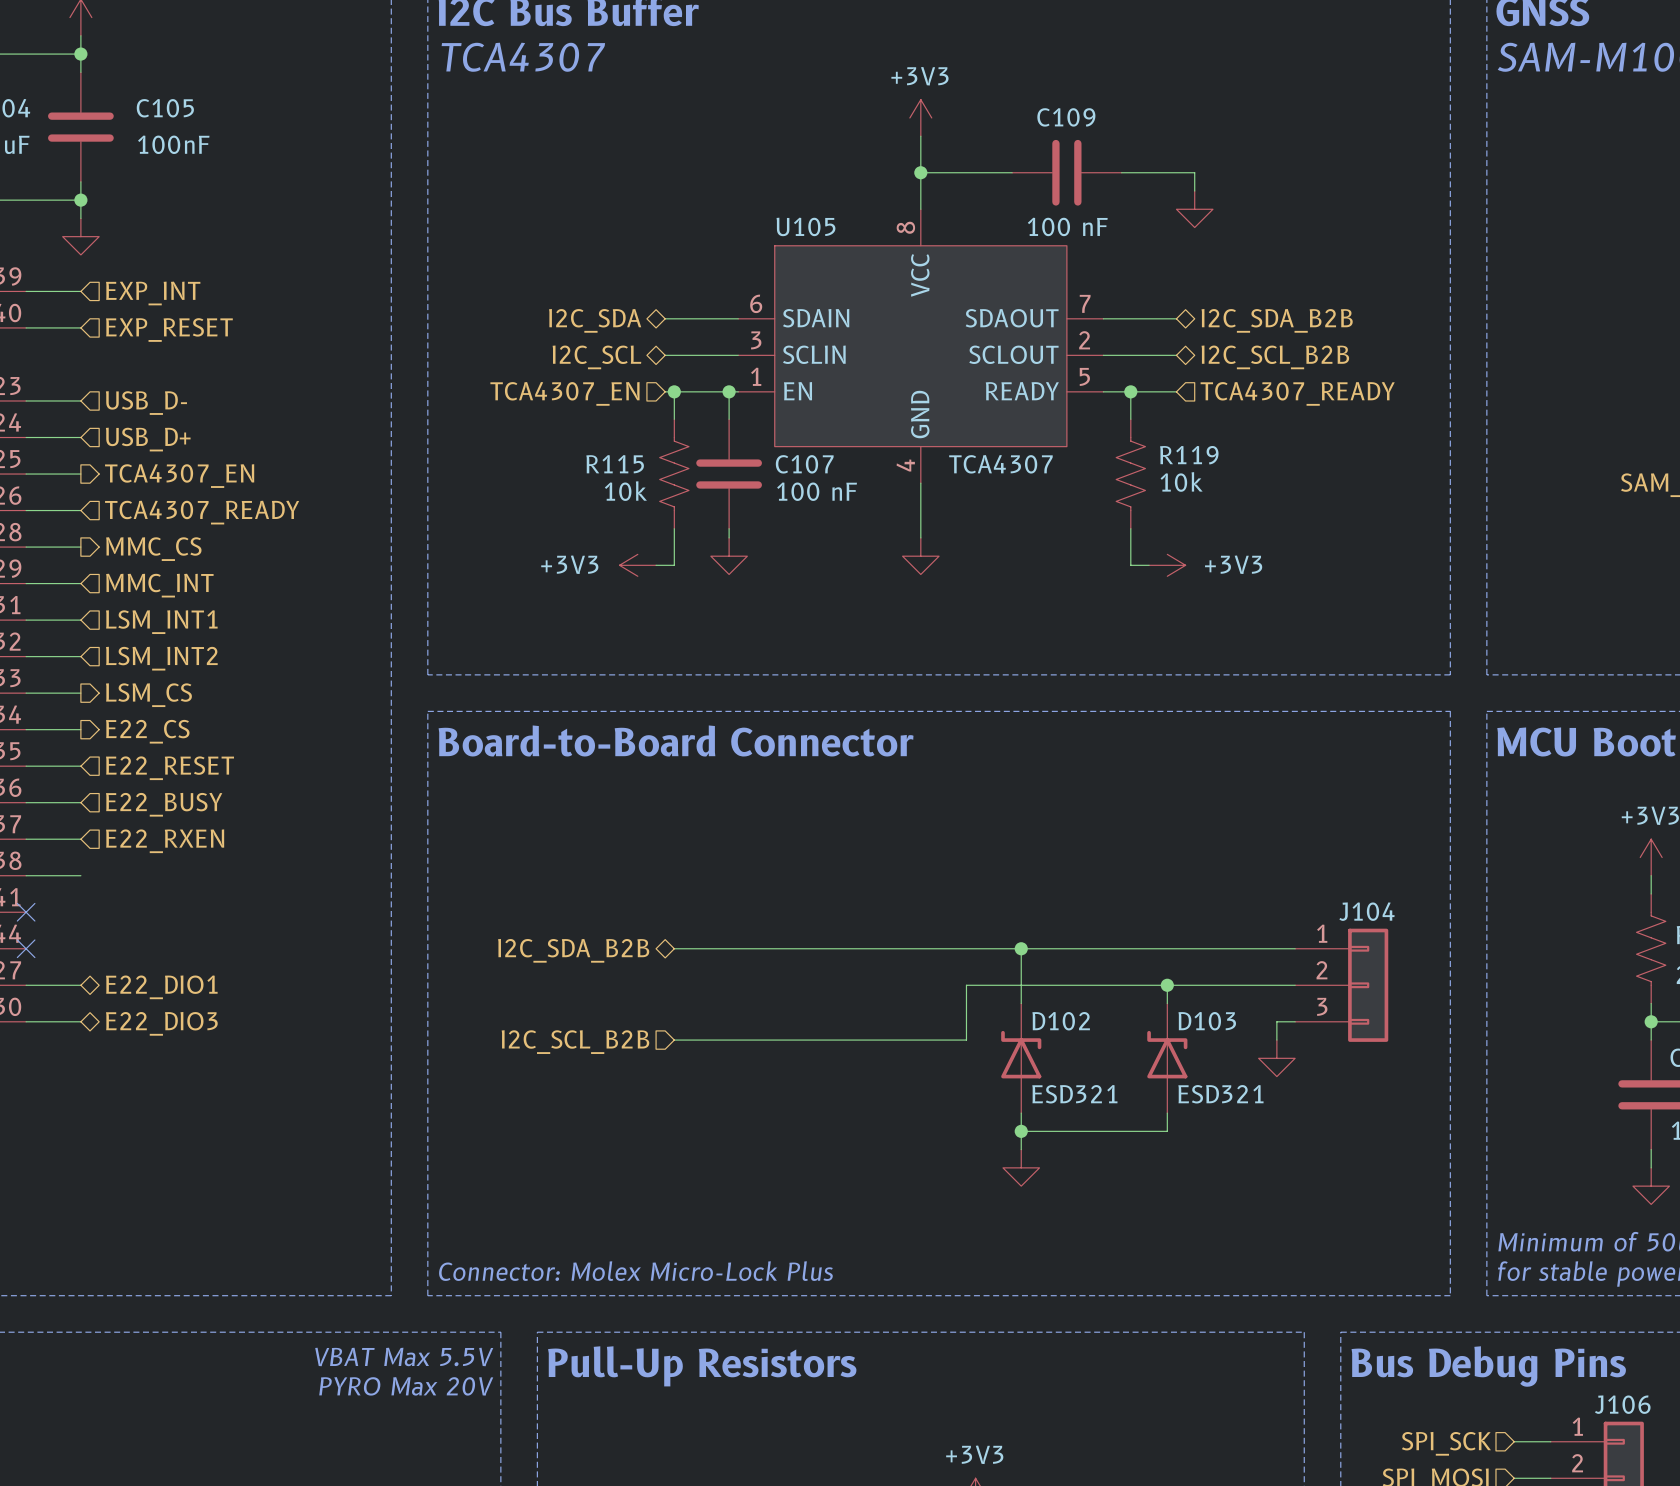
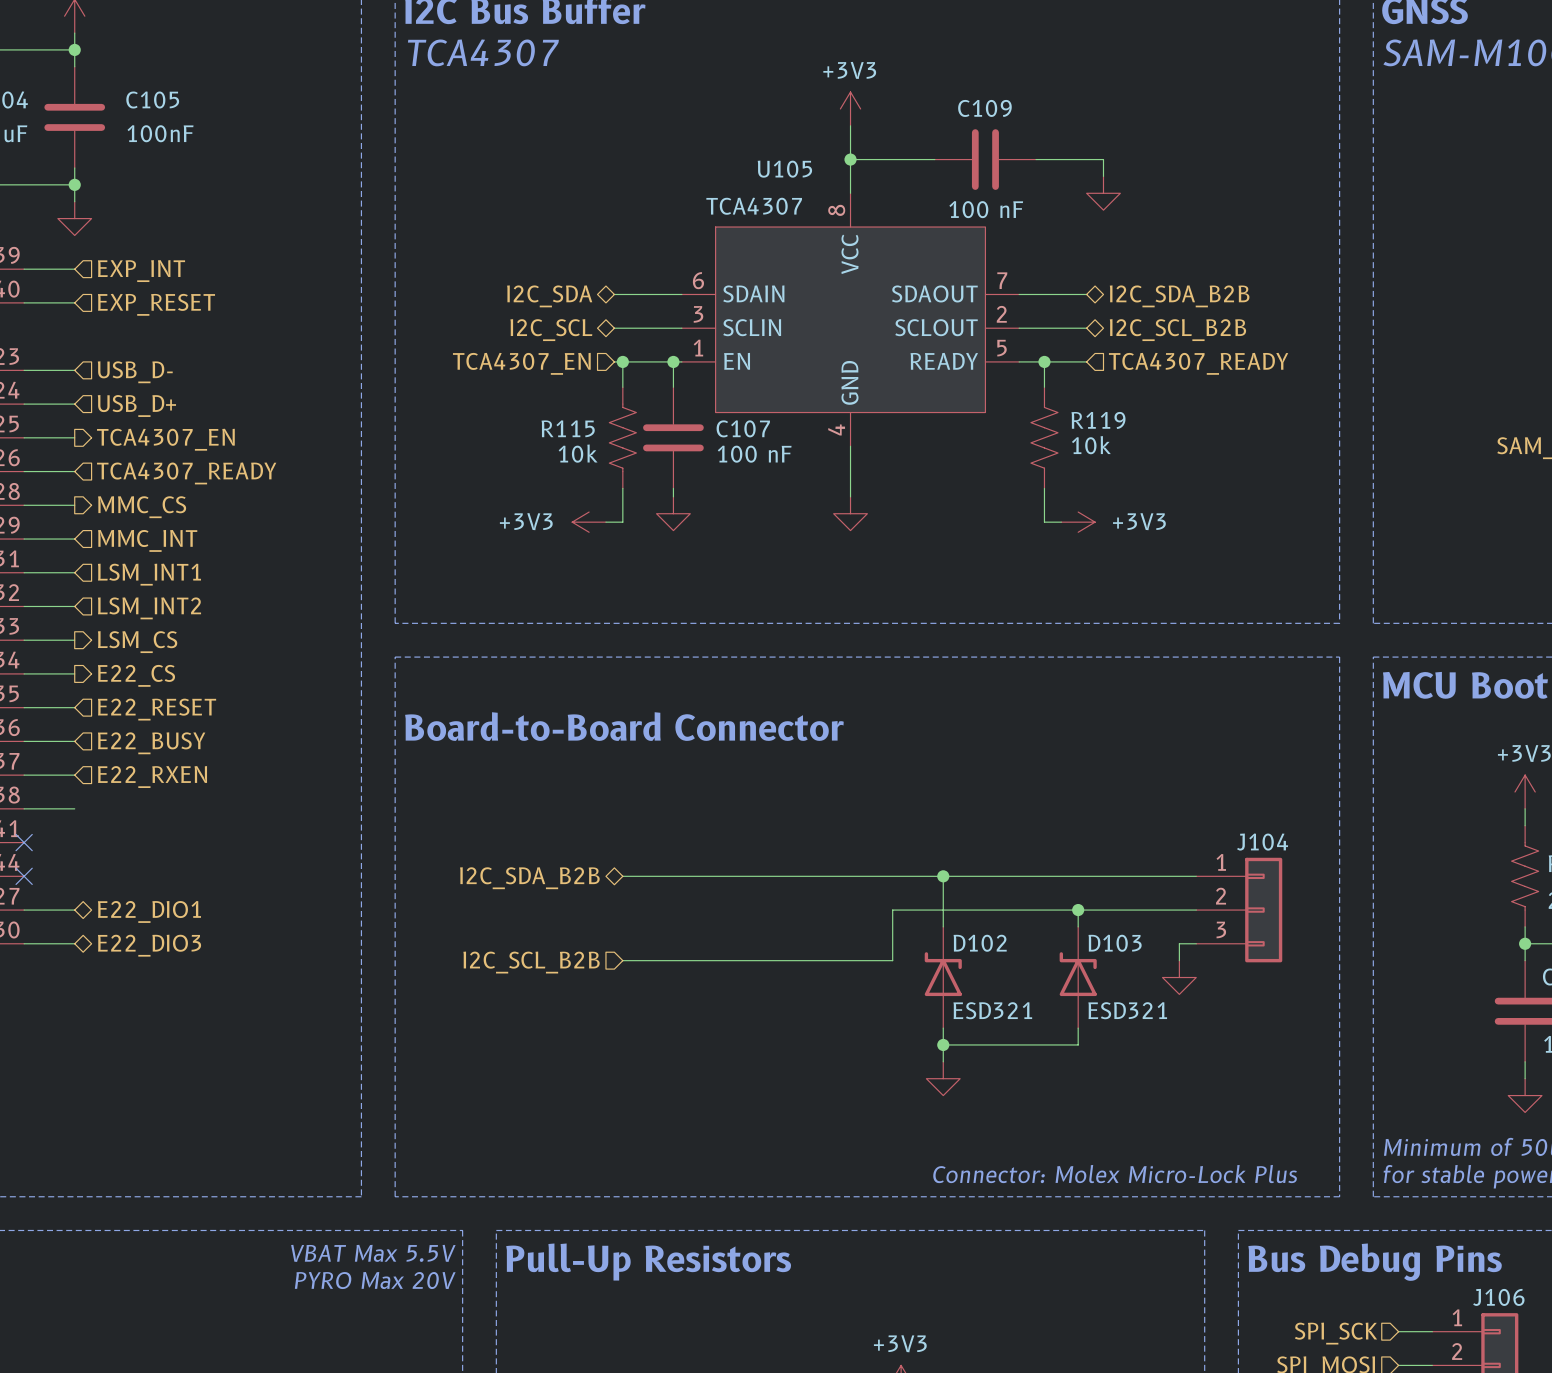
U105 name position: U105 (805, 226) -> U105 (784, 169)
U105 value position: TCA4307 (1000, 464) -> TCA4307 (754, 206)
text position: Board-to-Board Connector (676, 740) -> Board-to-Board Connector (624, 726)
text: Connector: Molex Micro-Lock Plus (635, 1271) -> none
text: none -> Connector: Molex Micro-Lock Plus (1115, 1174)

